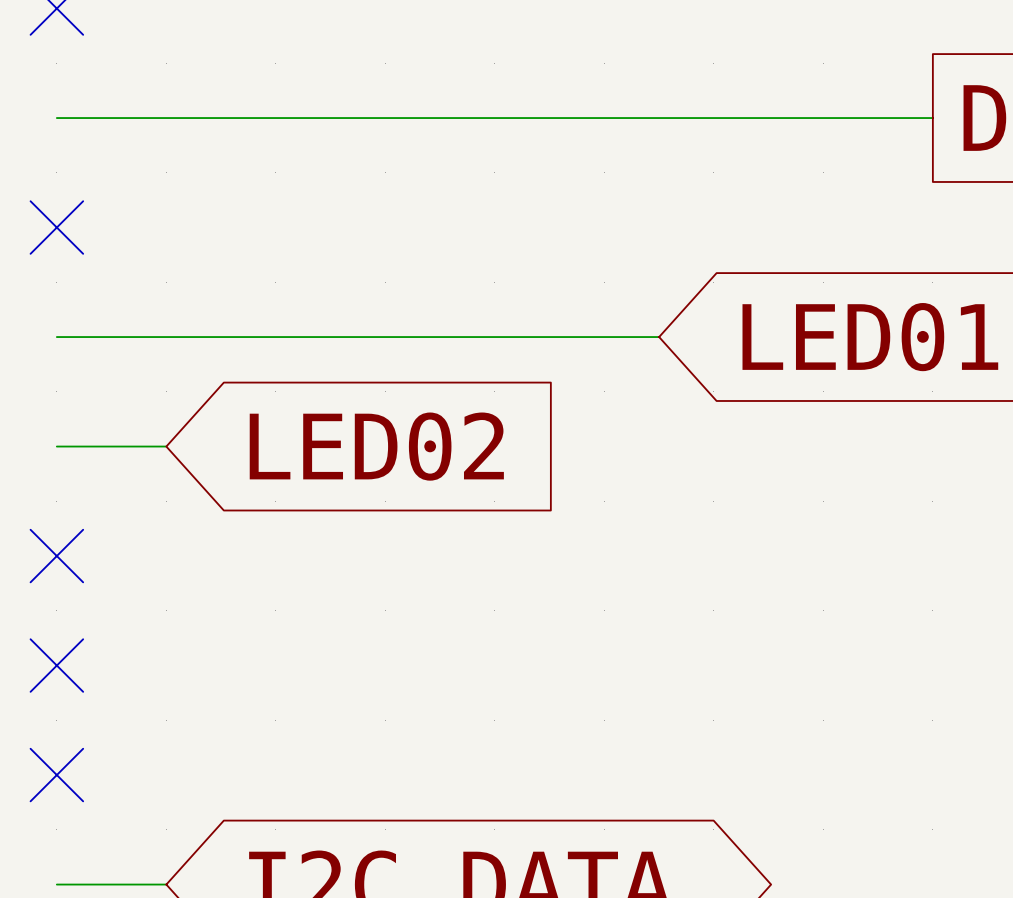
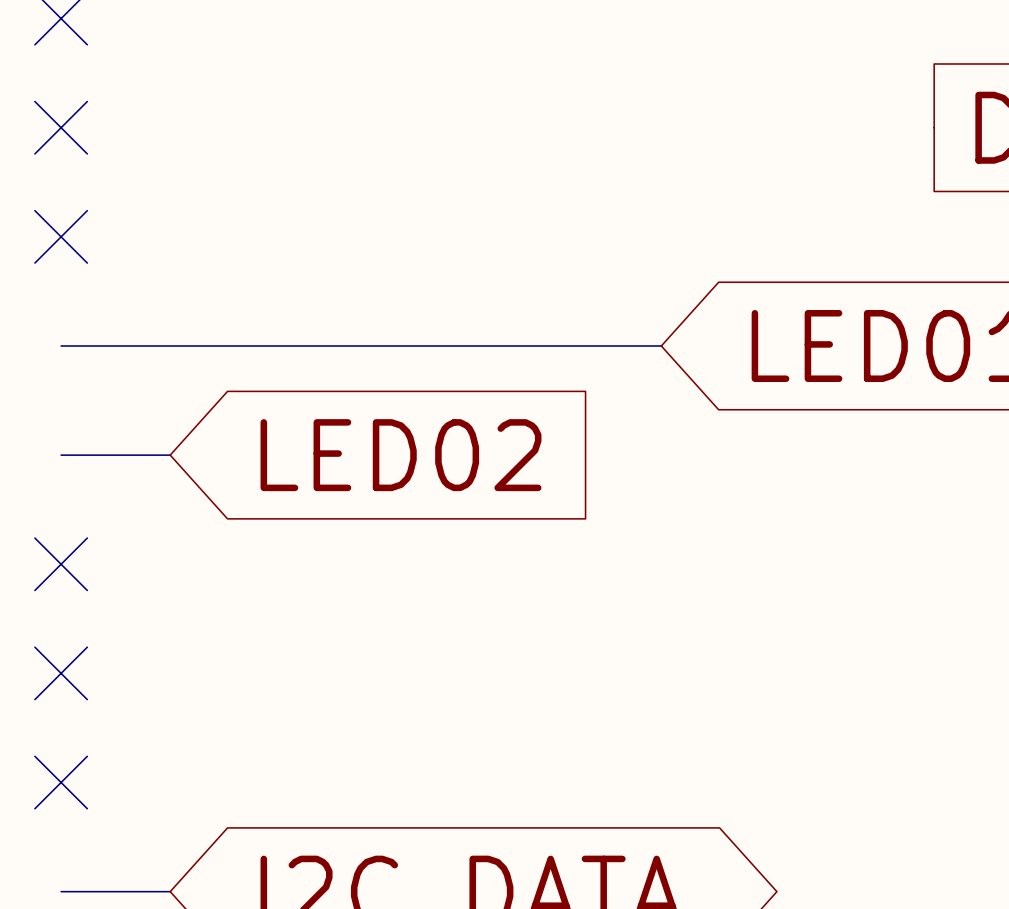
wire: (56, 118) (932, 118) -> none
no-connect mark: none -> (61, 127)

